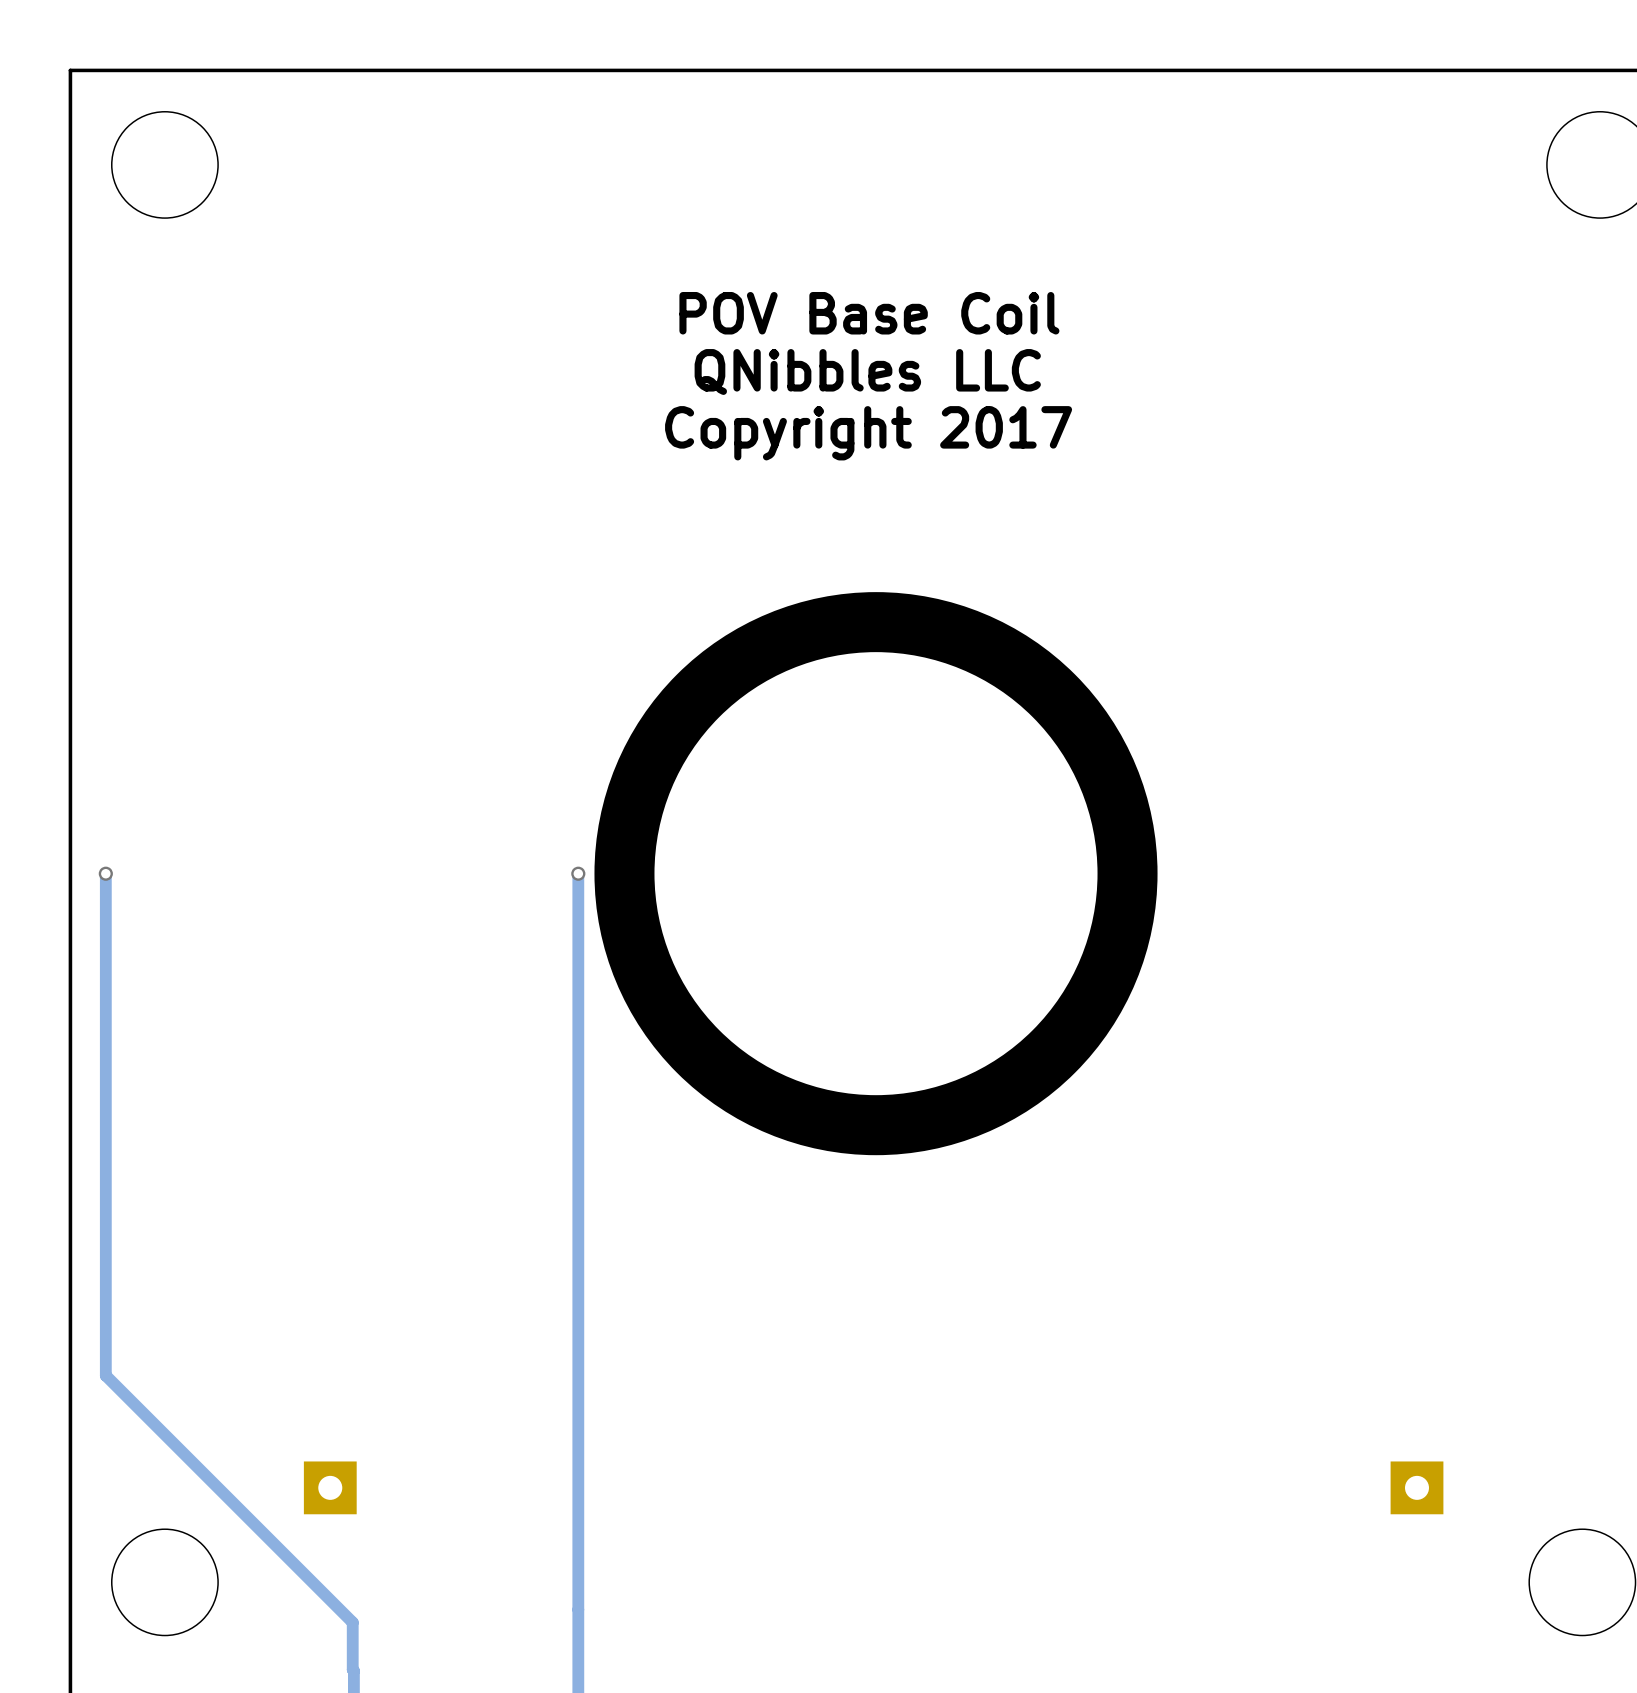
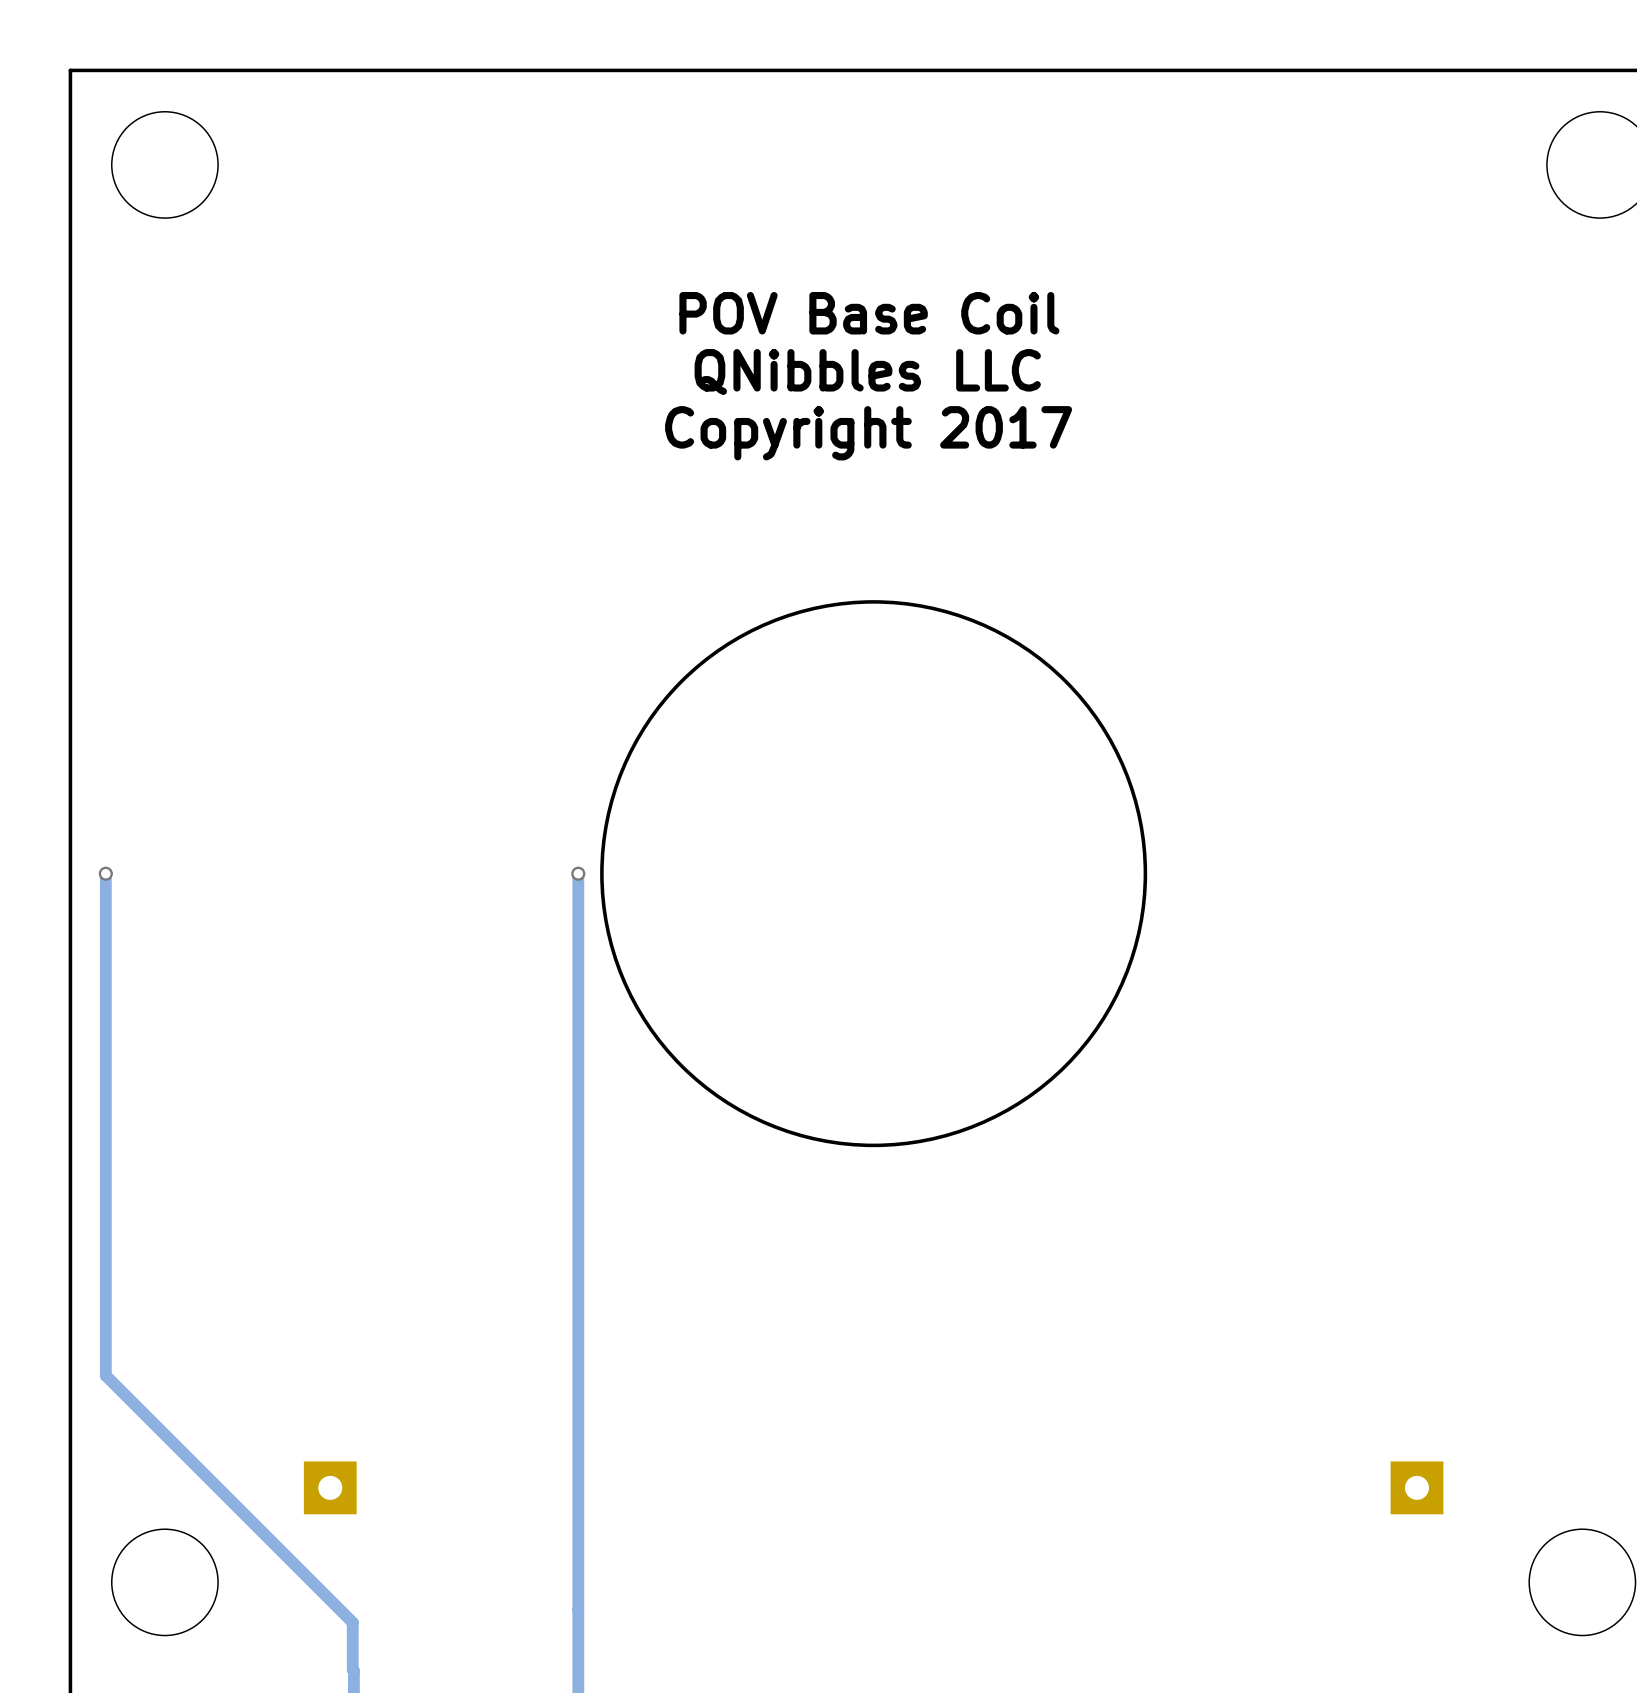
round board edge size: [594, 592, 1158, 1156] -> [600, 600, 1148, 1148]

